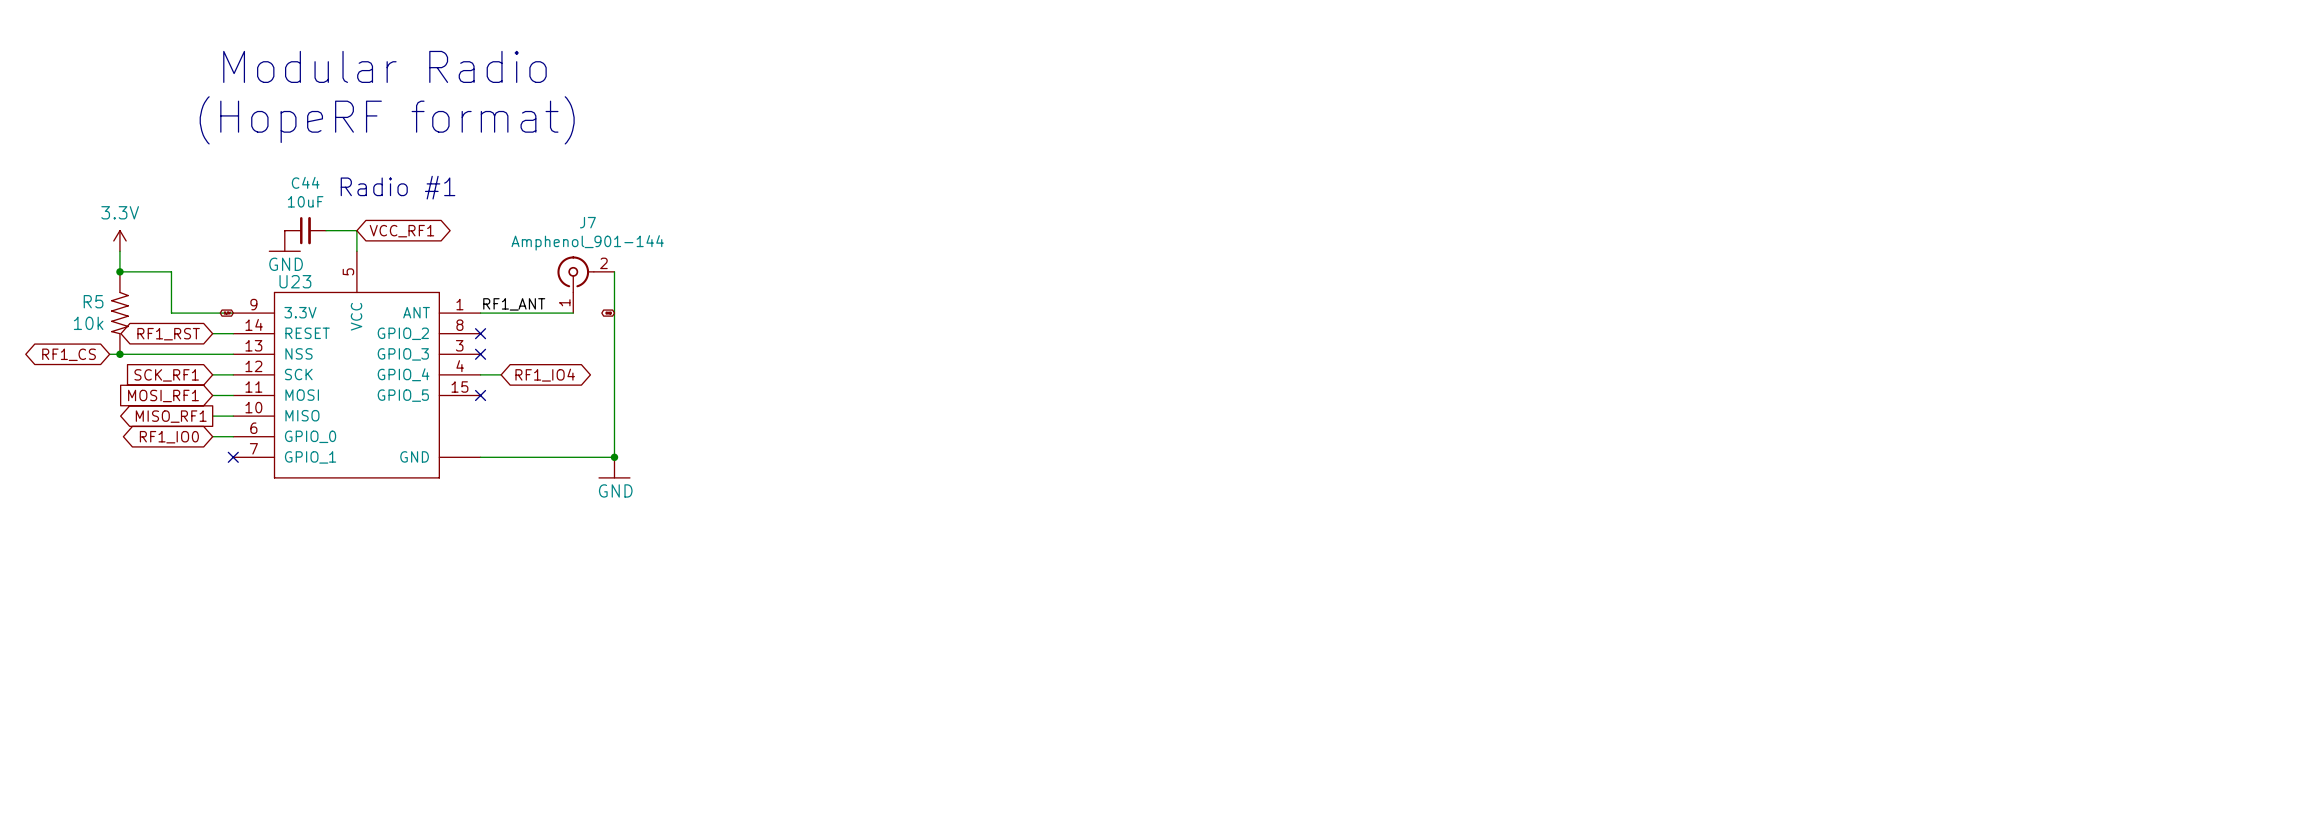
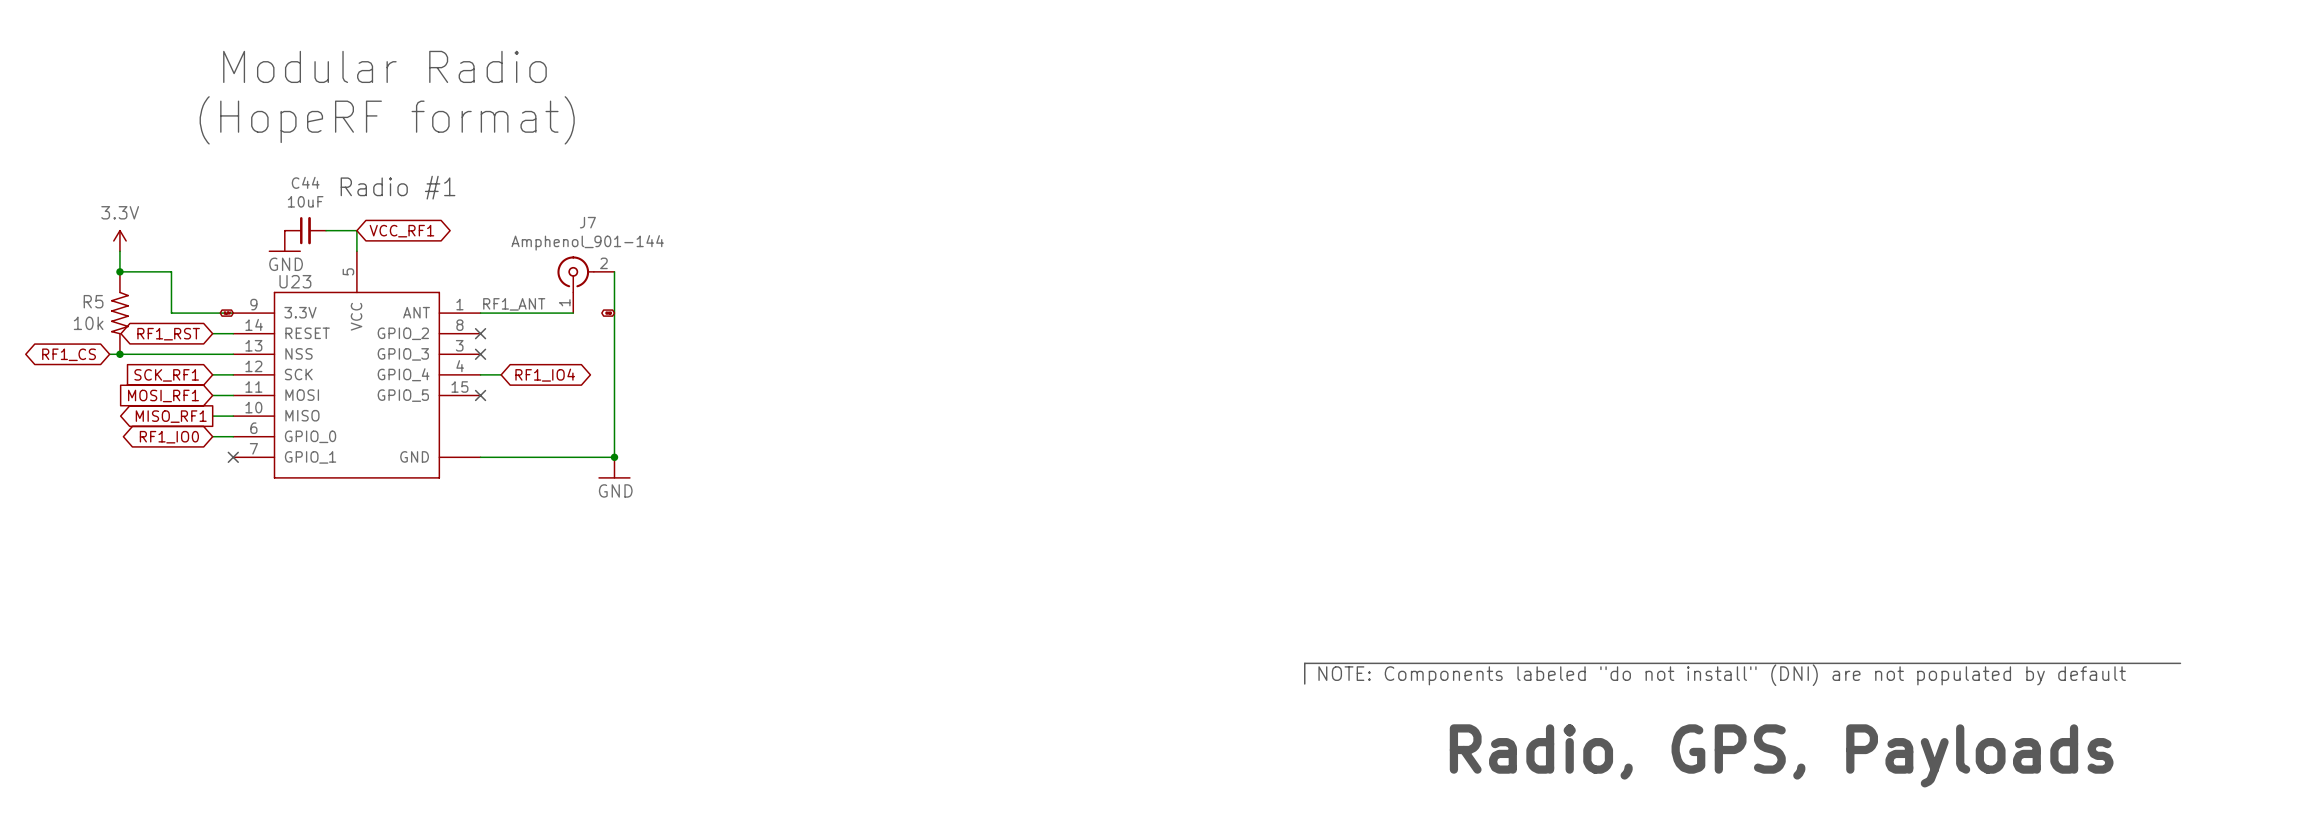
line: none -> (2180, 663) (1304, 663) (1304, 683)
text: none -> NOTE: Components labeled "do not install" (DNI) are not populated by default (1722, 675)
text: none -> Radio, GPS, Payloads (1781, 755)

